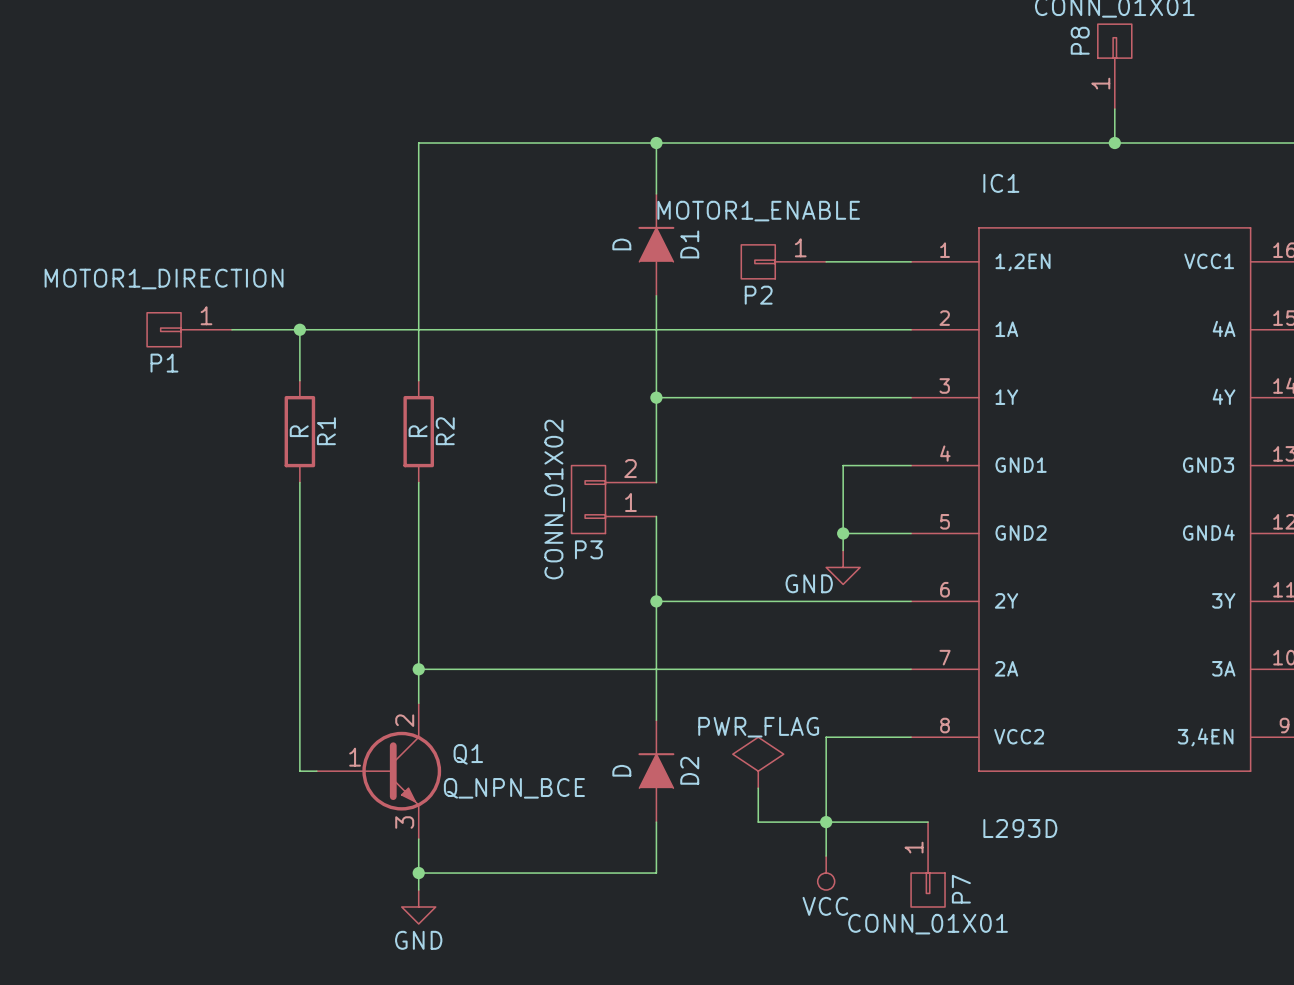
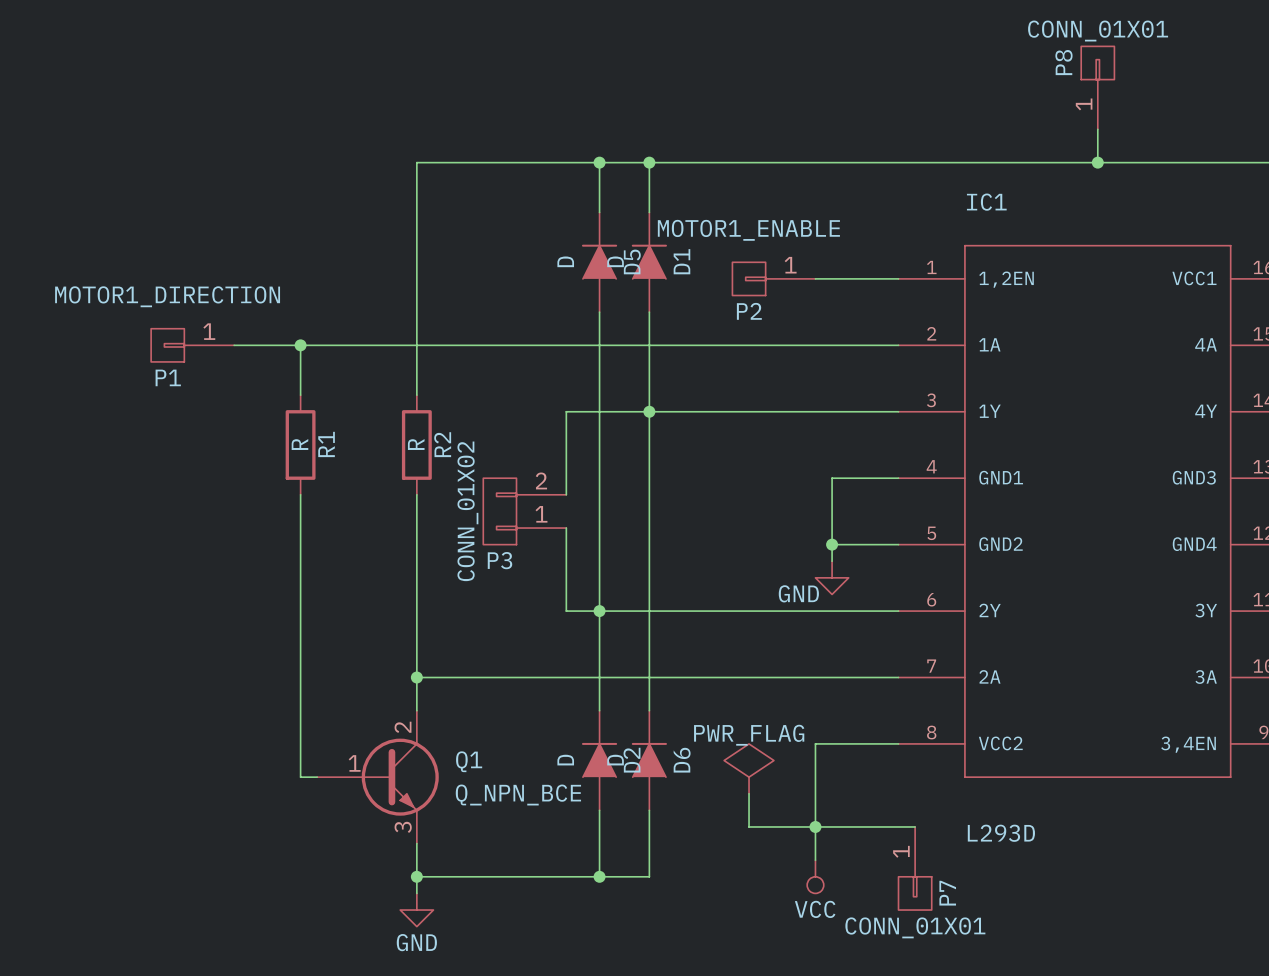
wire: none -> (599, 162) (599, 212)
junction: none -> (599, 162)
D5: none -> D (599, 262)
wire: none -> (599, 312) (599, 710)
wire: none -> (649, 411) (566, 411) (566, 494)
wire: none -> (649, 494) (649, 528)
P3 position: (613, 499) -> (524, 511)
wire: none -> (566, 528) (566, 611) (649, 611)
junction position: (656, 601) -> (599, 611)
D6: none -> D (649, 760)
D2 position: (656, 771) -> (599, 760)
wire: none -> (599, 810) (599, 876)
junction: none -> (599, 876)

